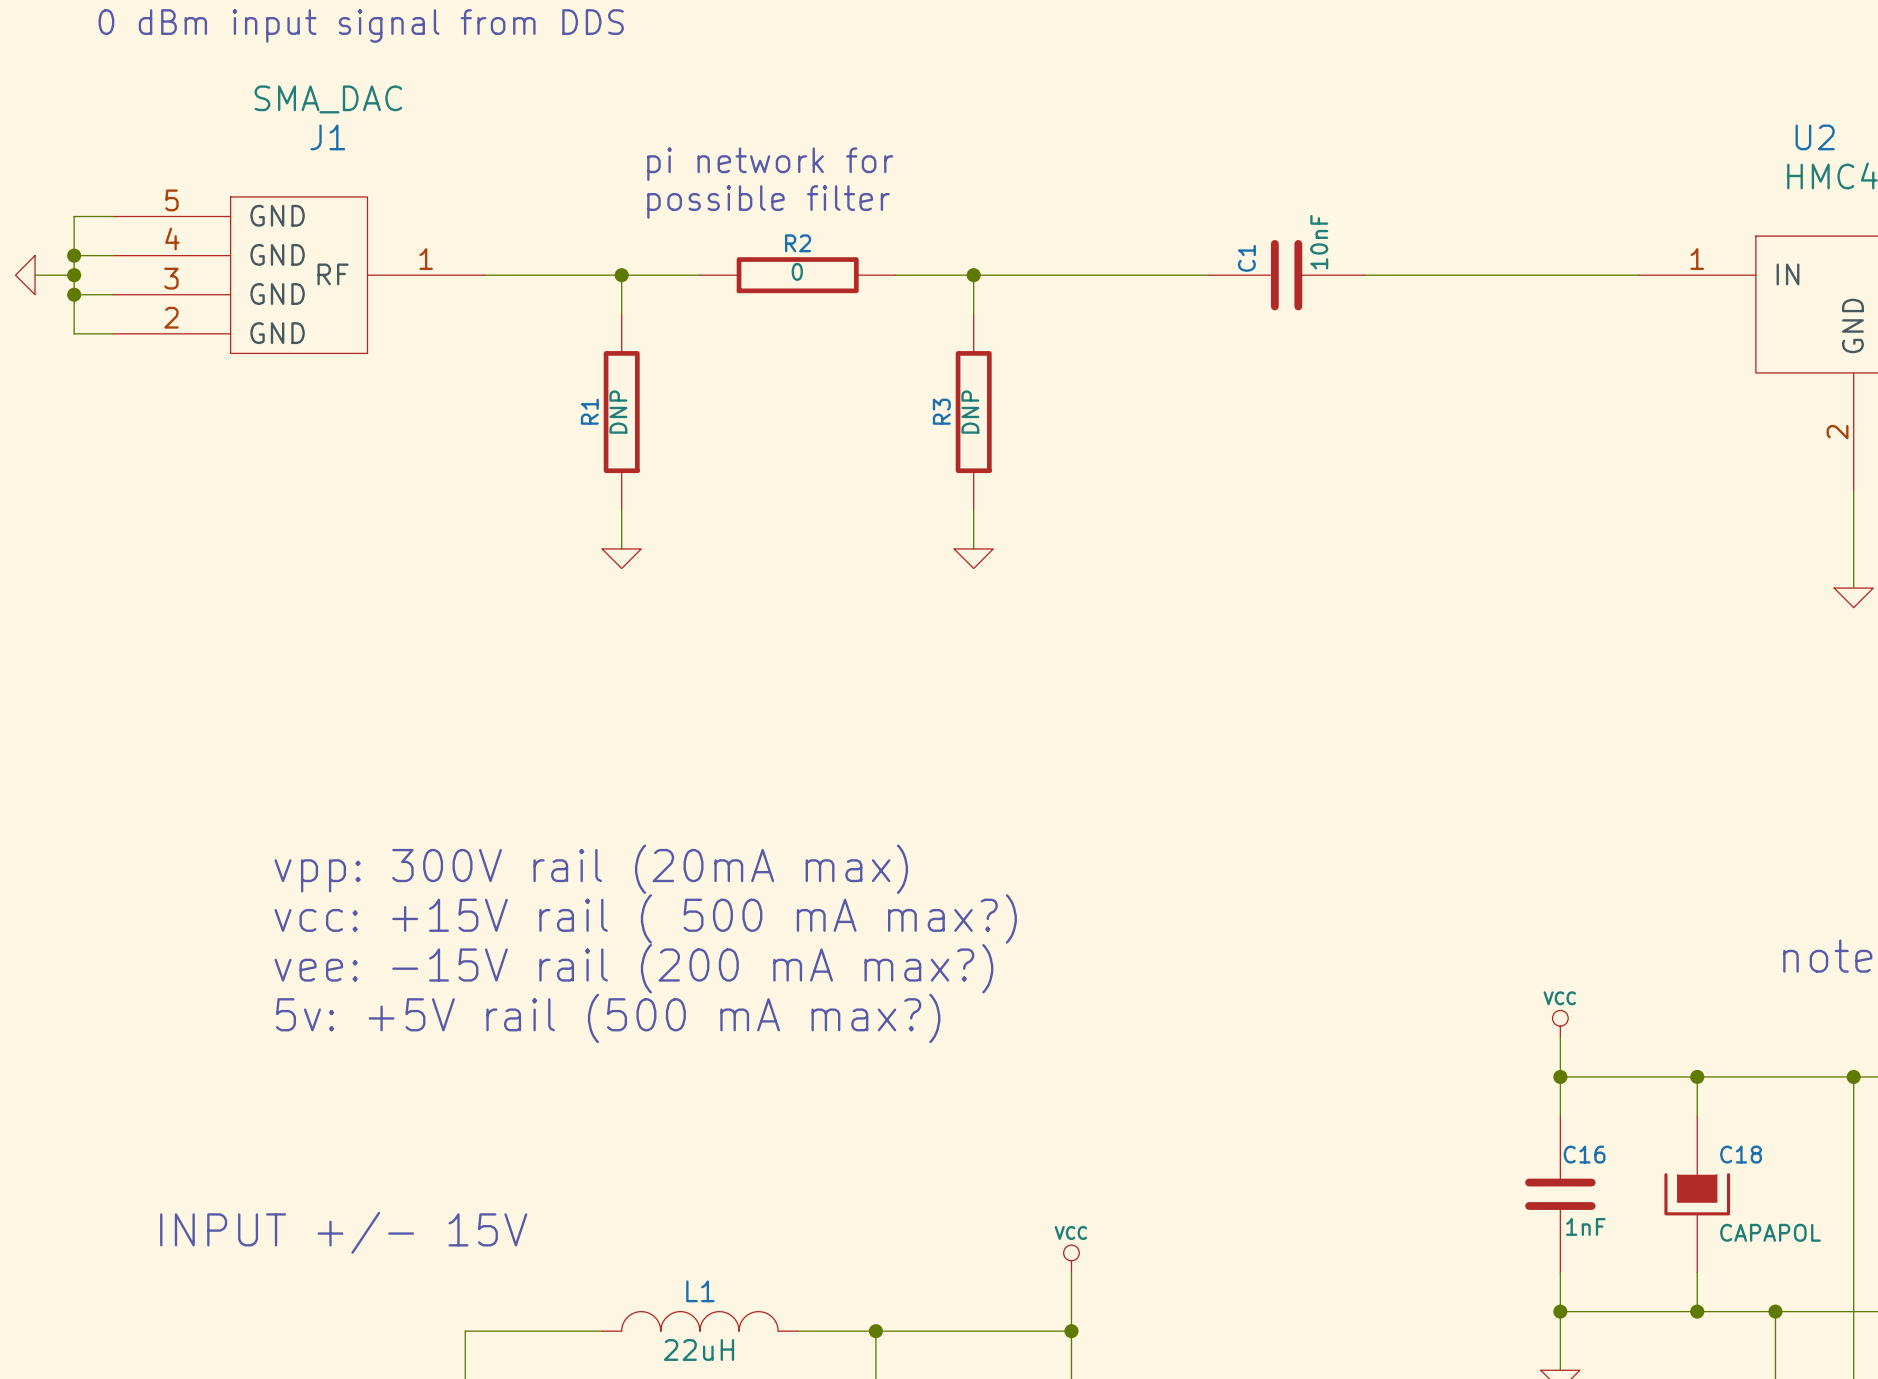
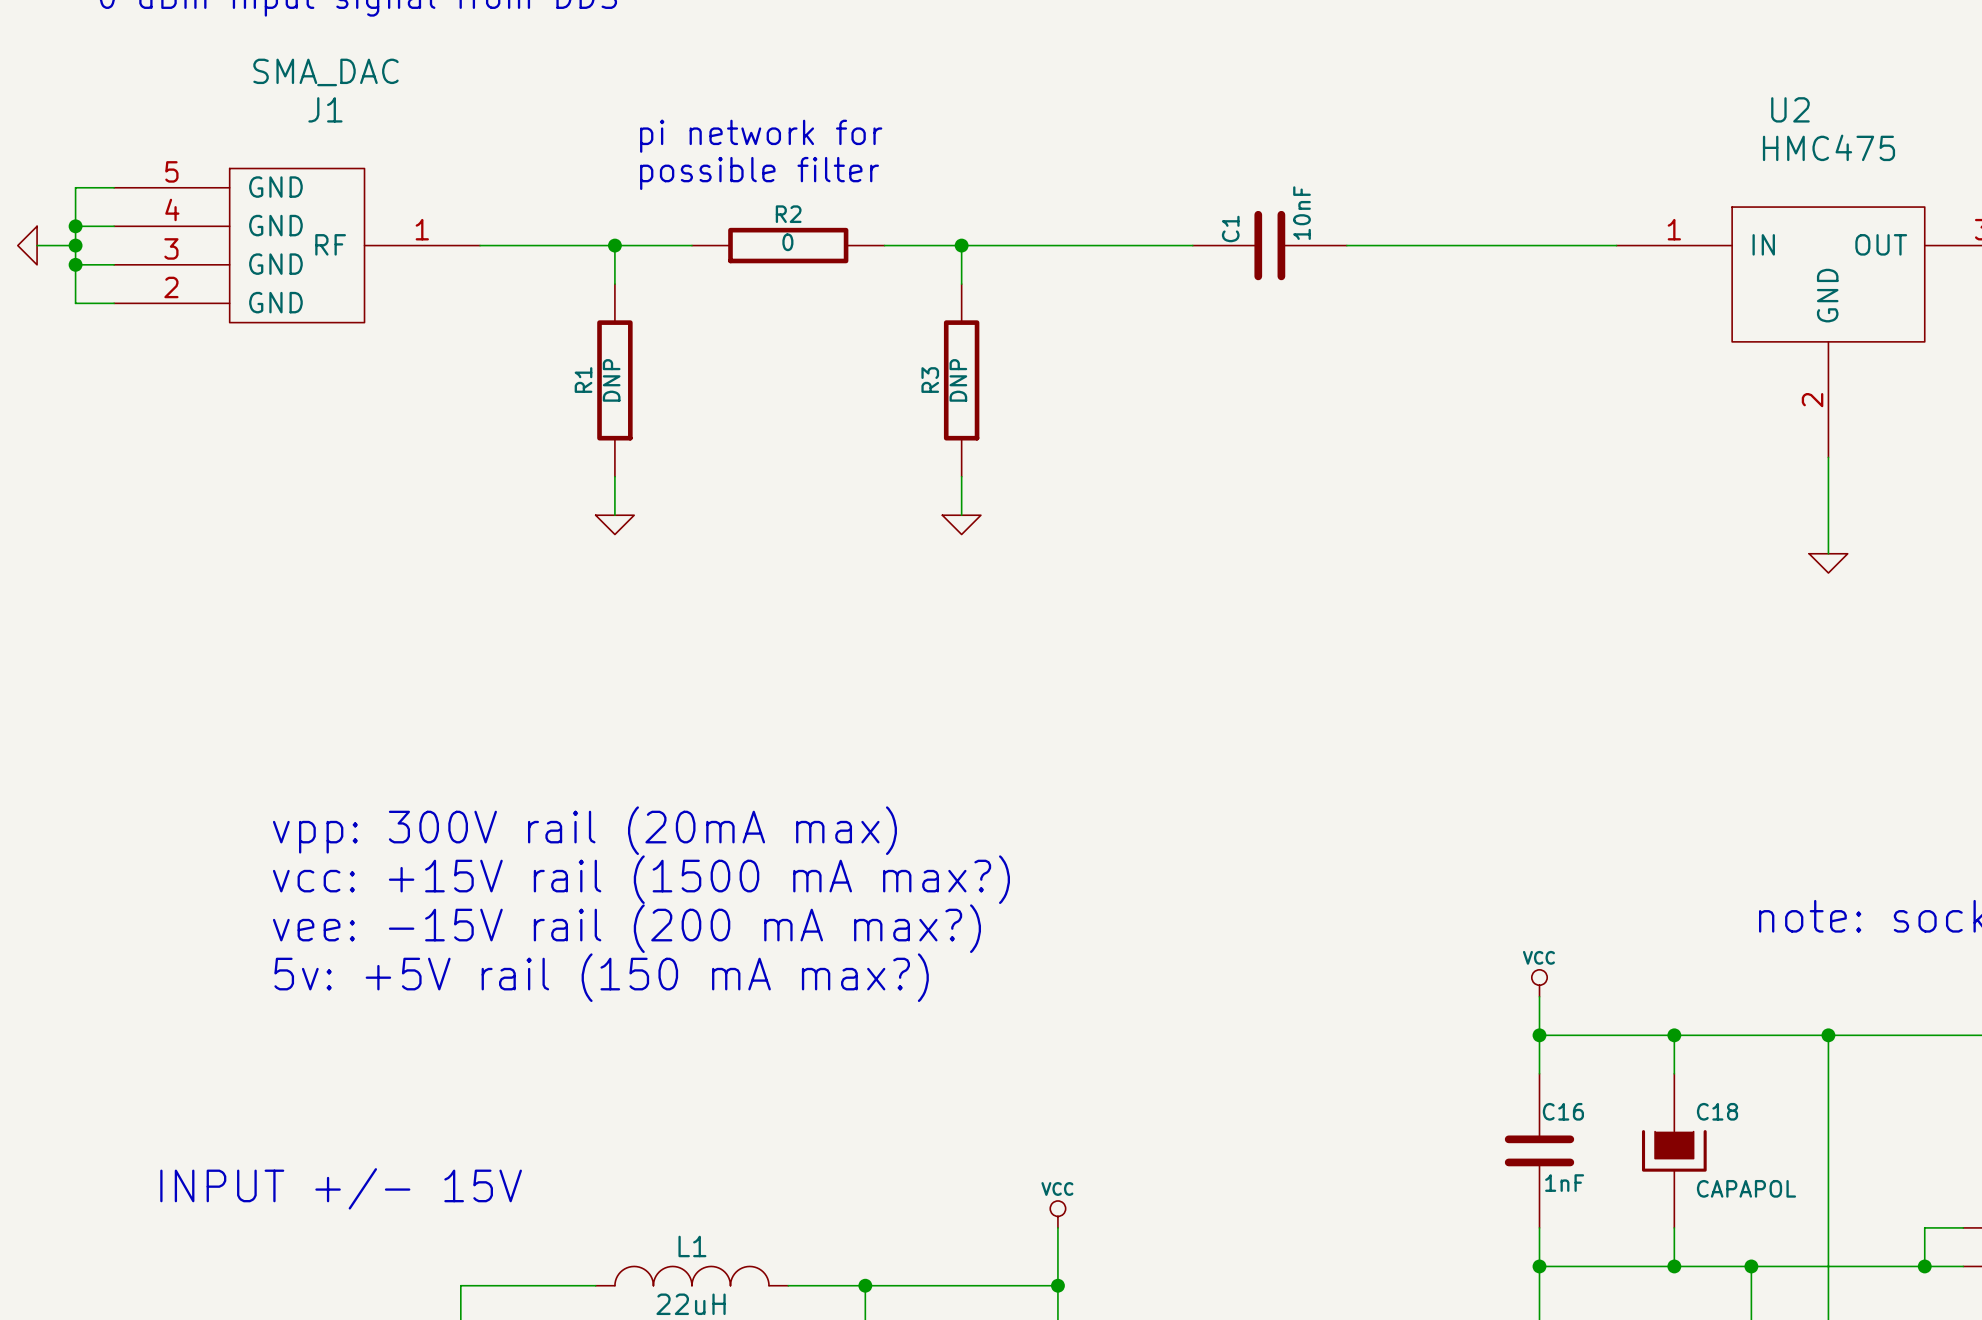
text: vcc: +15V rail ( 500 mA max?) (645, 918) -> vcc: +15V rail (1500 mA max?) (641, 879)
text: 5v: +5V rail (500 mA max?) (608, 1018) -> 5v: +5V rail (150 mA max?) (601, 977)

